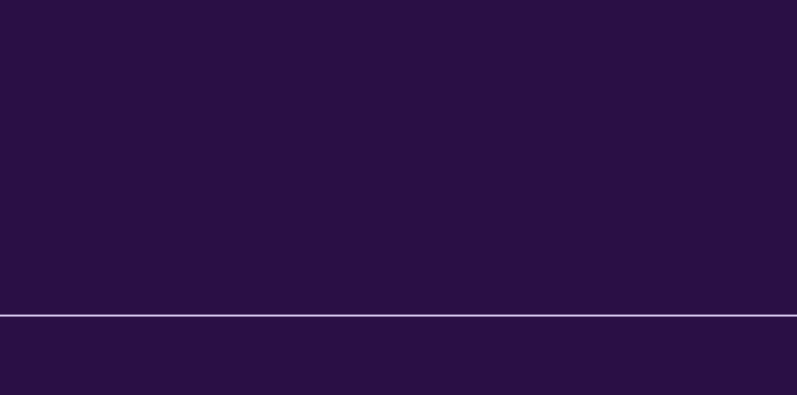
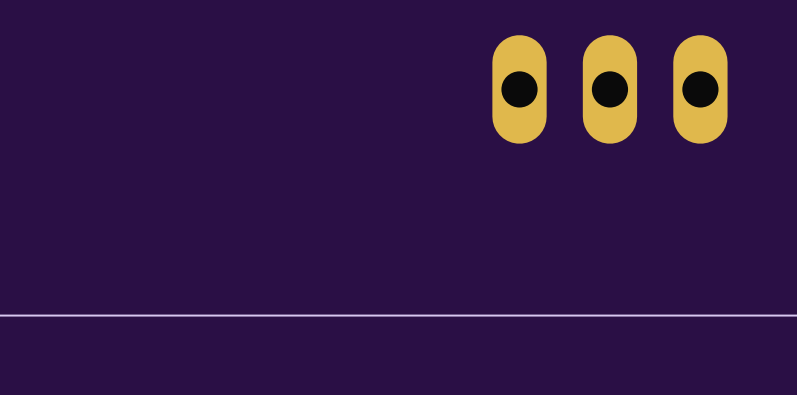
part: none -> (609, 89)

